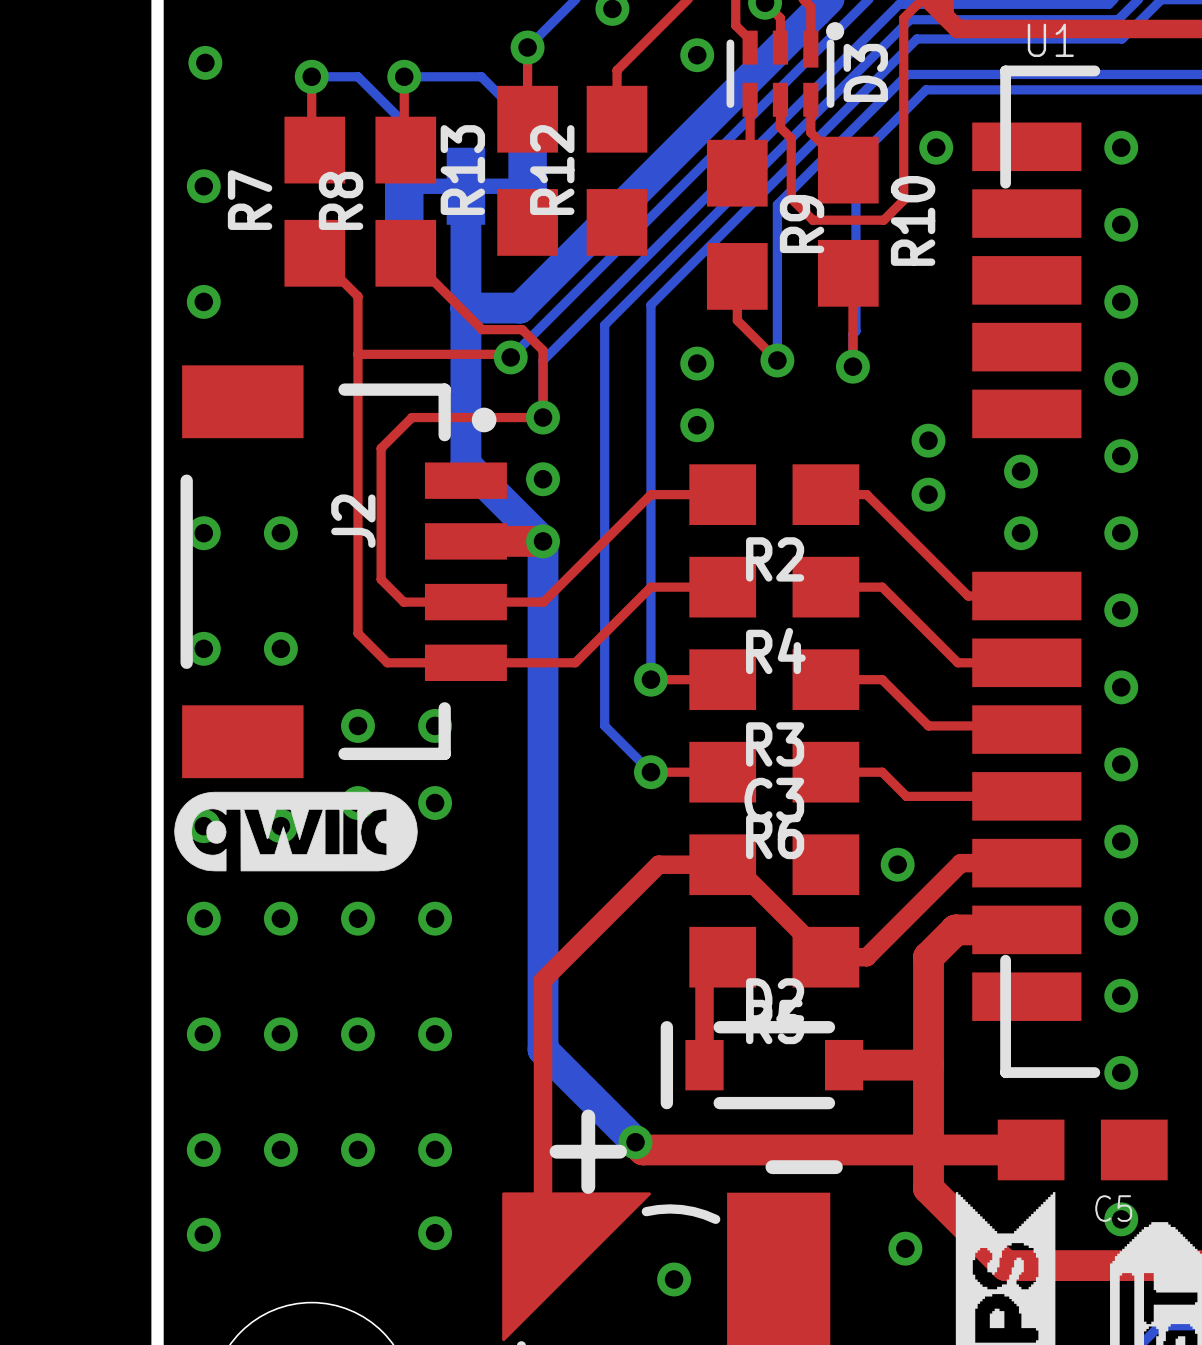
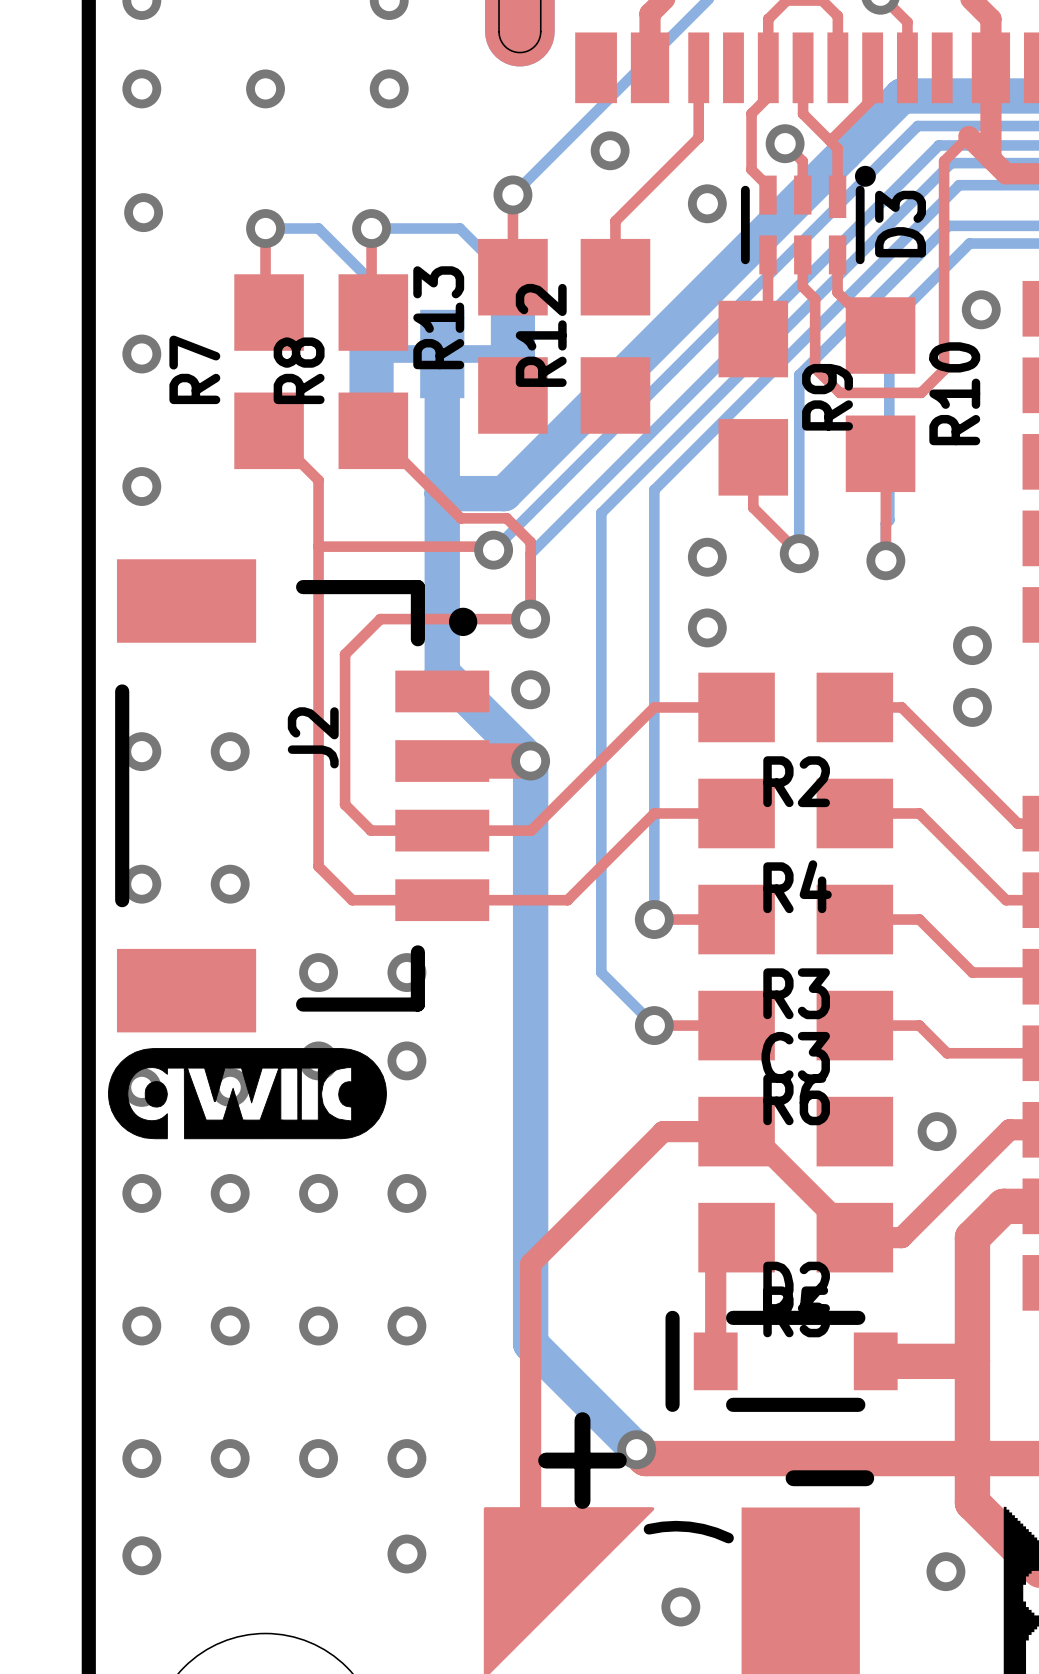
R13 name position: R13 (462, 170) -> R13 (438, 317)

